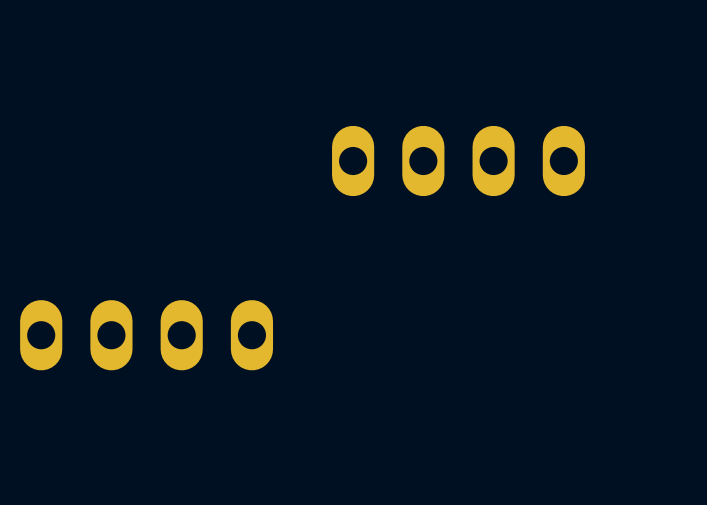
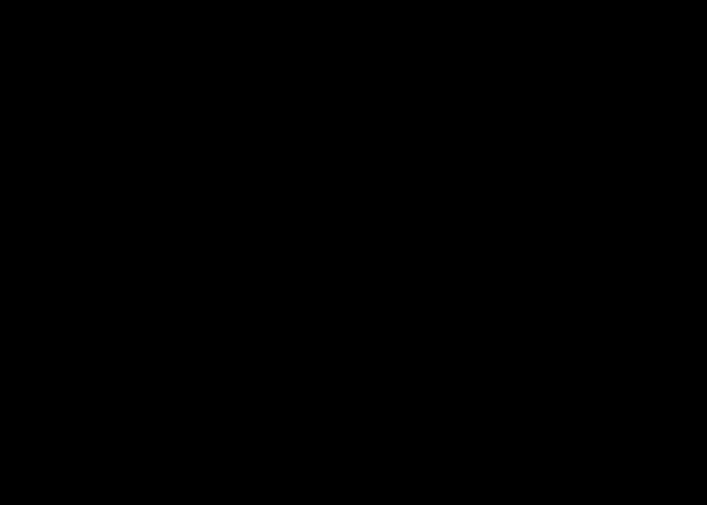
part: (458, 161) -> none
part: (146, 335) -> none

